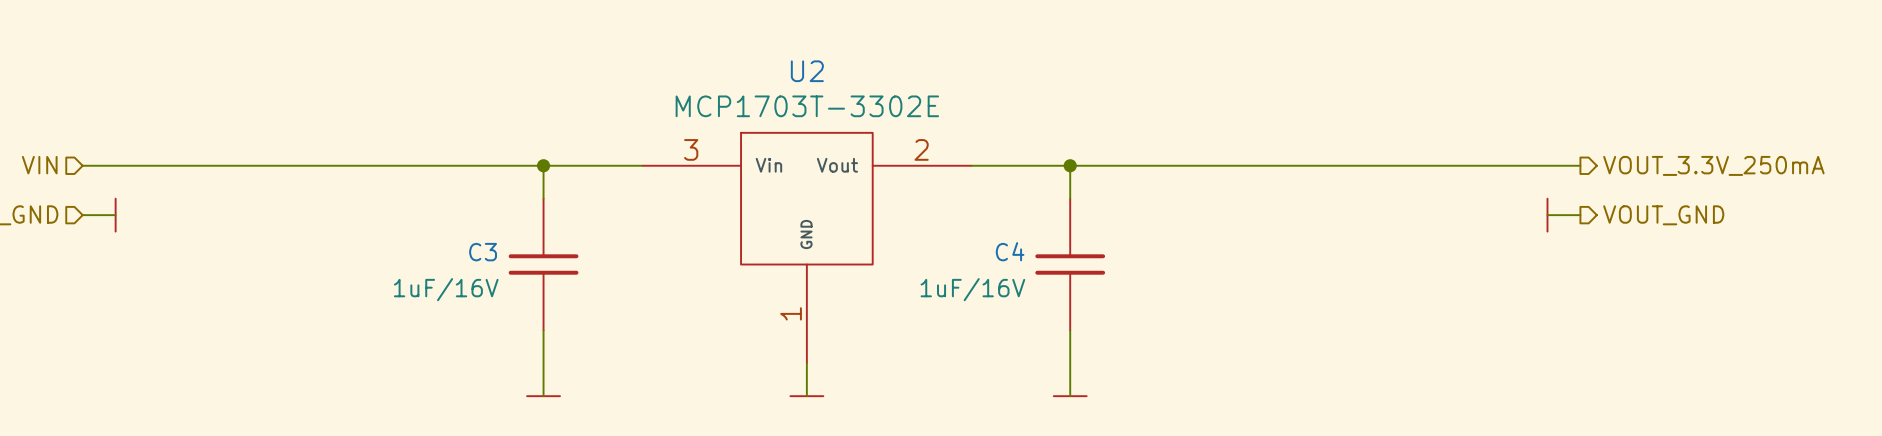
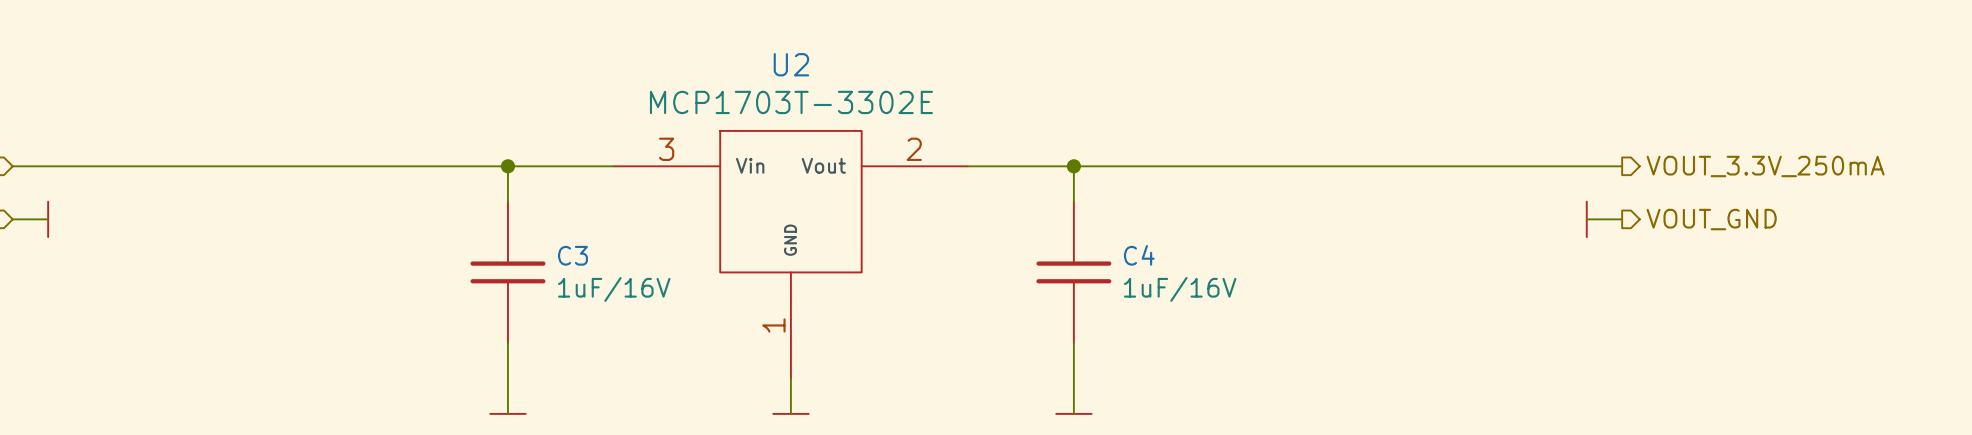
C4 name position: C4 (1010, 251) -> C4 (1139, 255)
C3 name position: C3 (483, 252) -> C3 (572, 255)
C3 value position: 1uF/16V (446, 289) -> 1uF/16V (614, 289)
C4 value position: 1uF/16V (972, 289) -> 1uF/16V (1180, 289)

